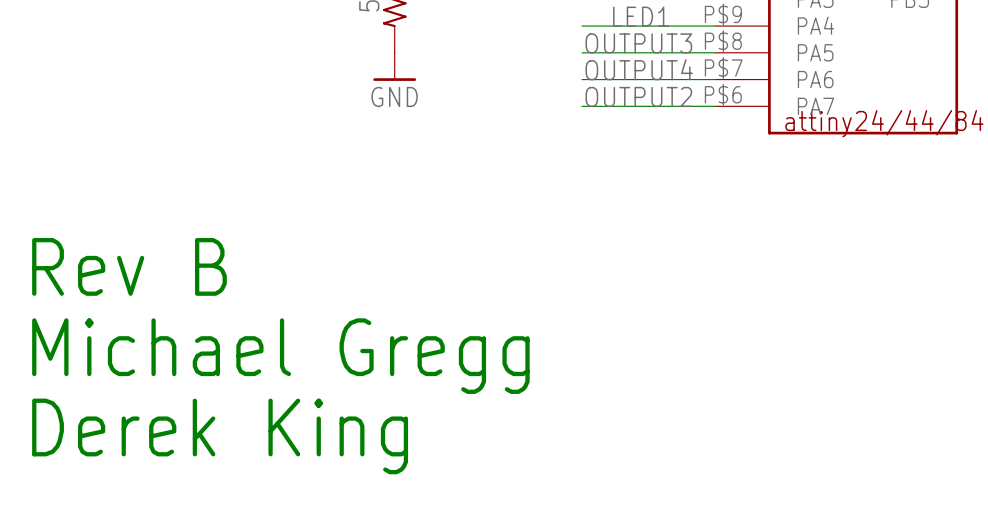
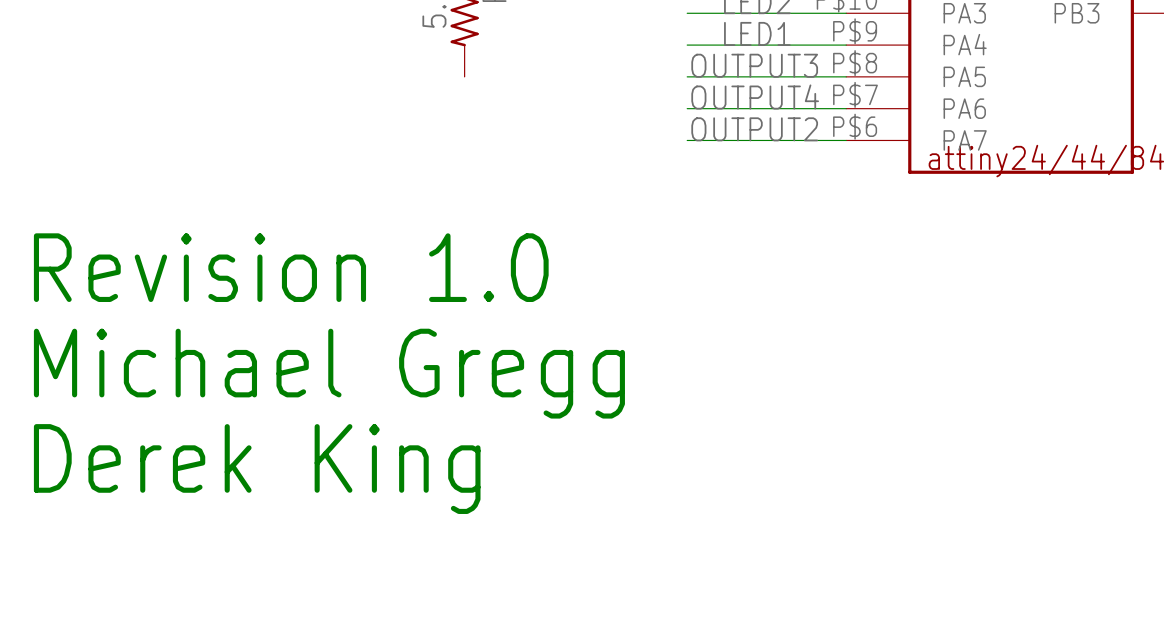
power symbol: GND (394, 66) -> none
text: none -> Revision 1.0 (291, 267)
text: Rev B (129, 266) -> none
text position: Michael Gregg (280, 356) -> Michael Gregg (329, 373)
text position: Derek King (220, 436) -> Derek King (257, 469)

